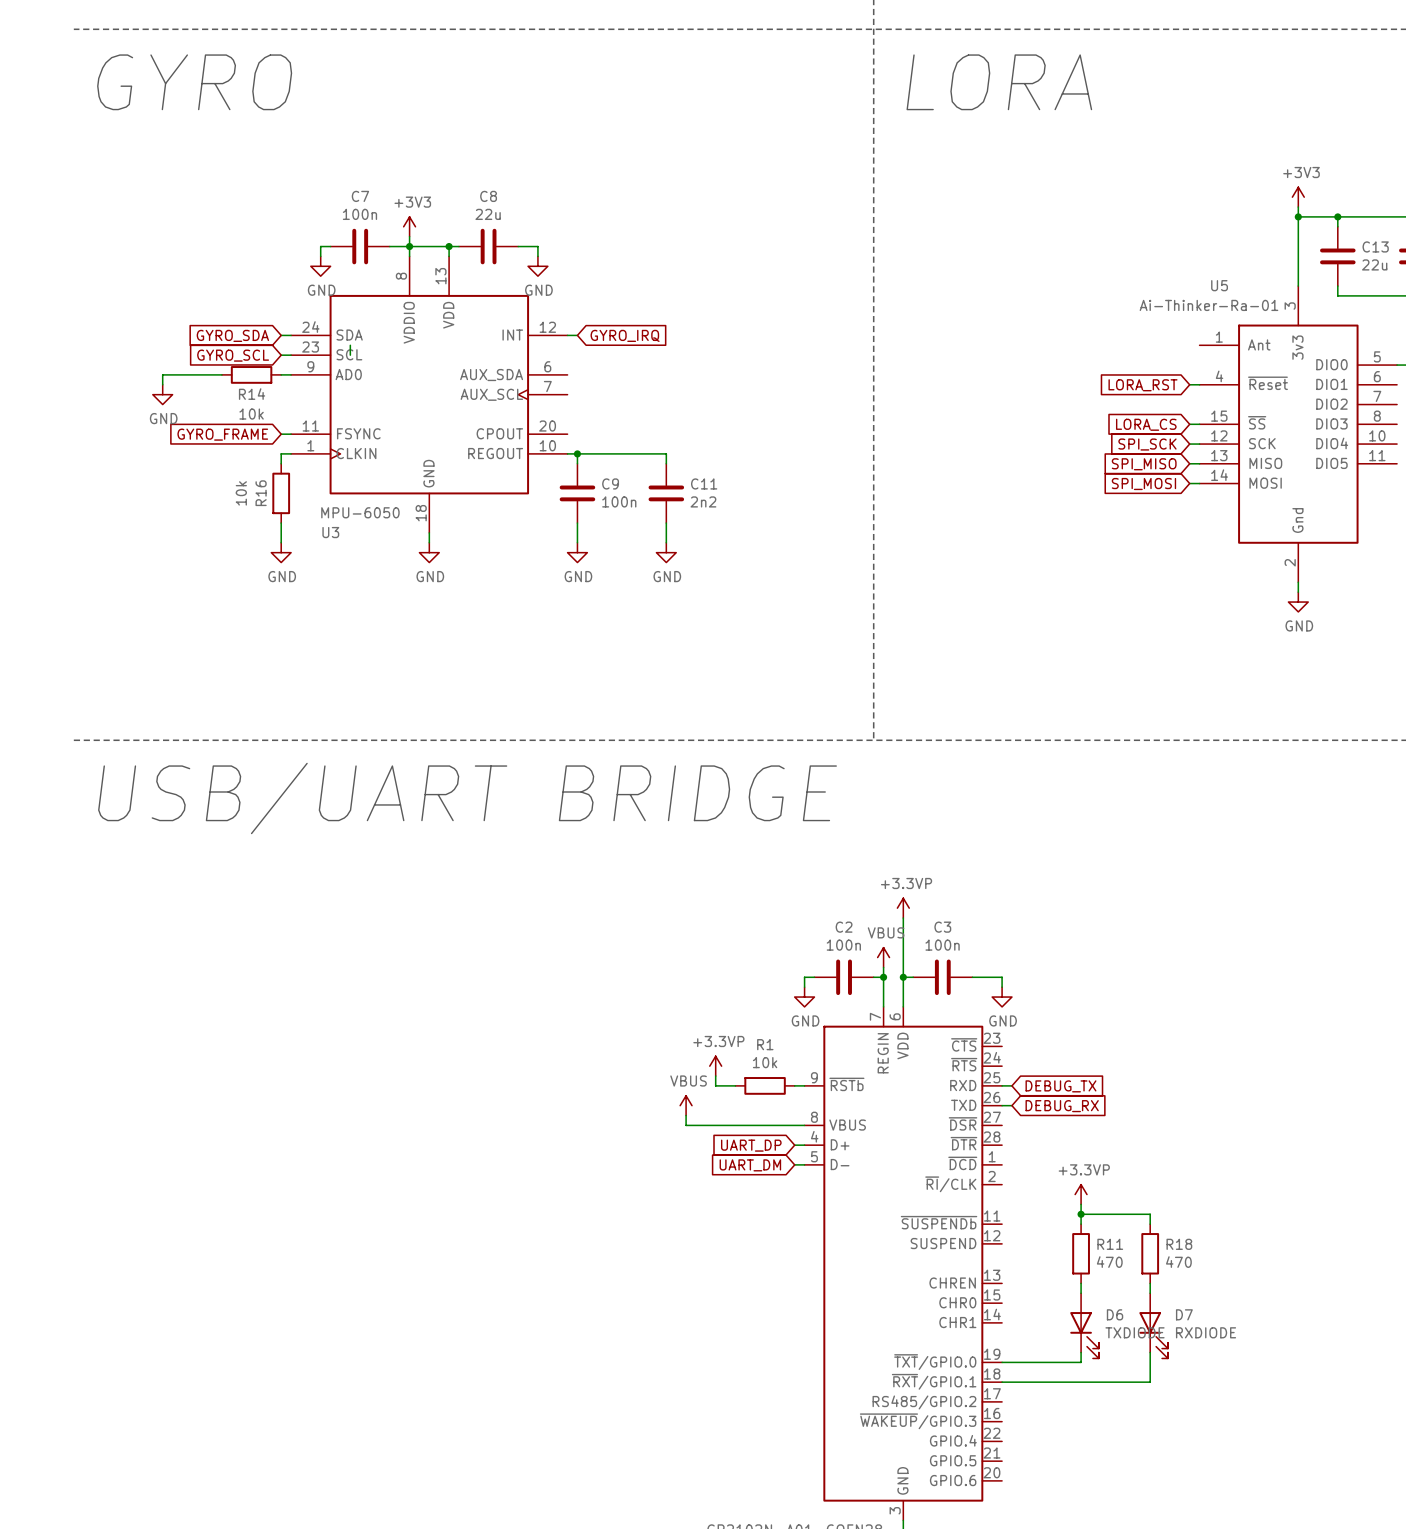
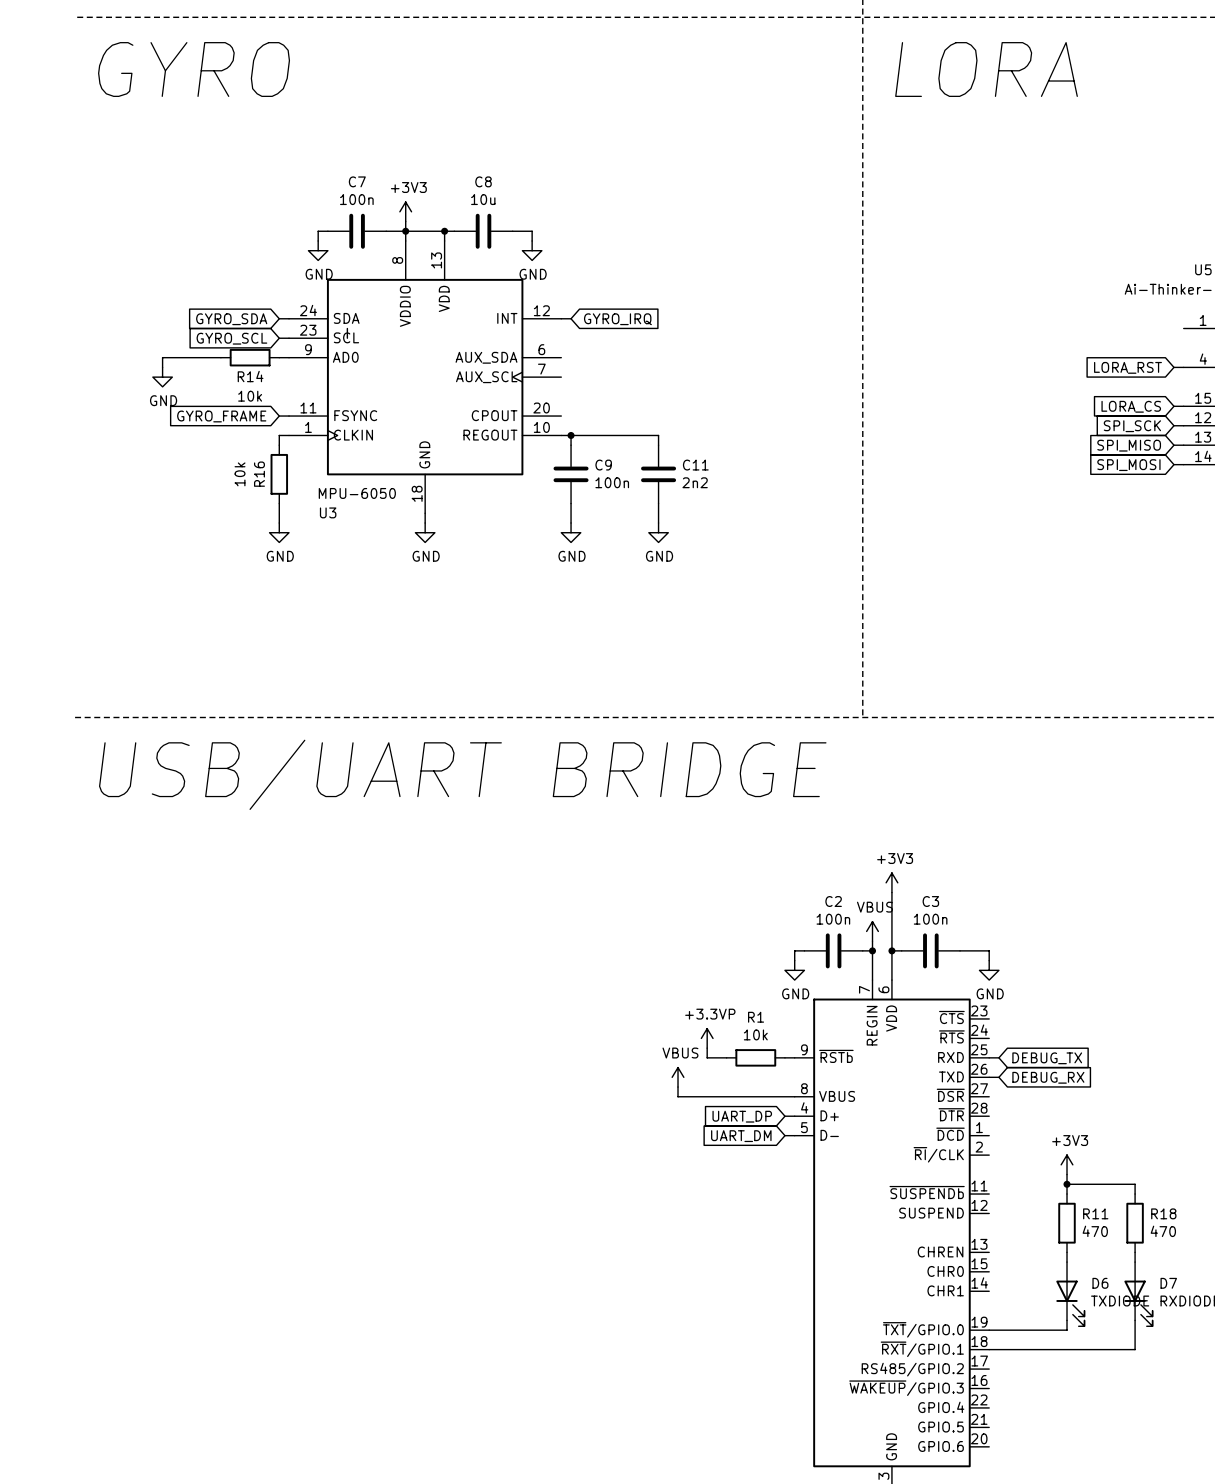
C8 value: 22u (488, 214) -> 10u (483, 199)
power symbol: +3.3VP (903, 908) -> +3V3 (891, 882)
power symbol: +3.3VP (1081, 1194) -> +3V3 (1067, 1164)

